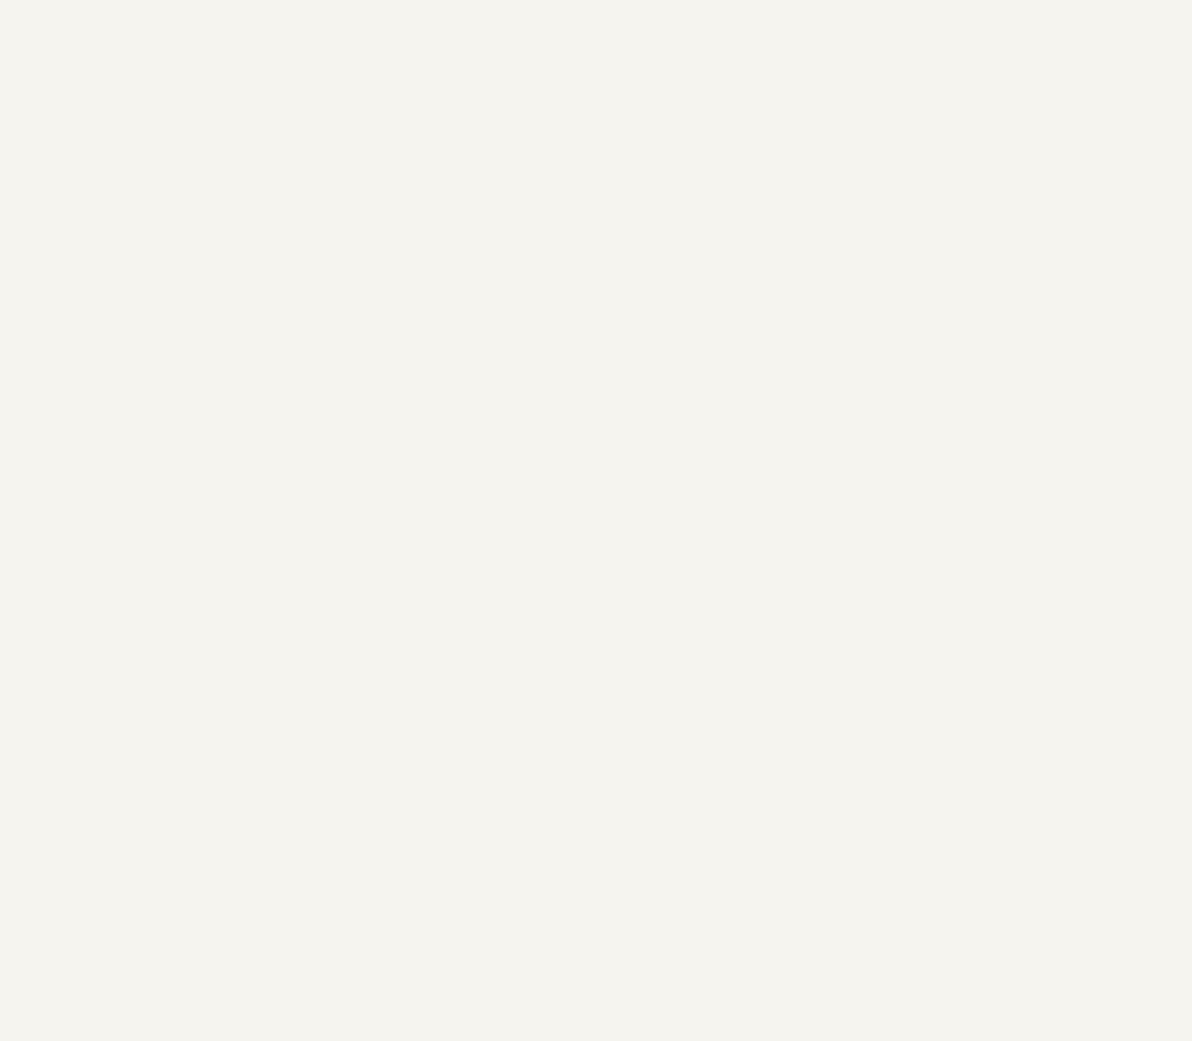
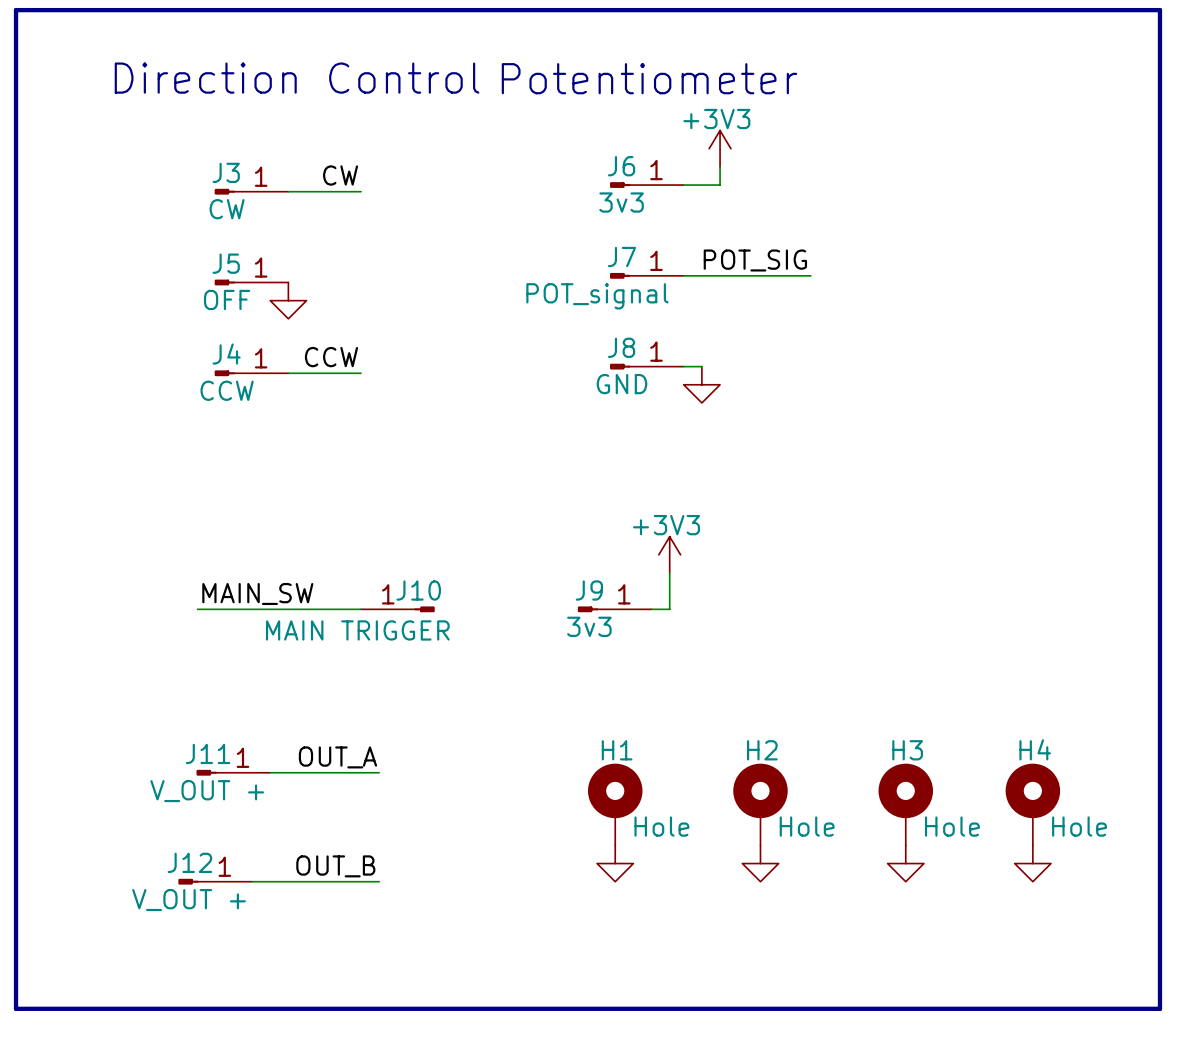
line: none -> (16, 10) (1159, 10) (1159, 1008) (16, 1008) (16, 10)
text: none -> Direction Control (297, 78)
text: none -> Potentiometer (649, 78)
power symbol: none -> +3V3 (720, 148)
wire: none -> (720, 166) (720, 185) (683, 185)
label: none -> CW (340, 175)
J6: none -> 3v3 (646, 185)
J3: none -> CW (251, 191)
wire: none -> (288, 191) (361, 191)
label: none -> POT_SIG (755, 260)
J7: none -> POT_signal (646, 275)
wire: none -> (683, 275) (810, 275)
J5: none -> OFF (251, 282)
power symbol: none -> (288, 300)
label: none -> CCW (331, 357)
J8: none -> GND (646, 366)
wire: none -> (683, 366) (701, 366)
J4: none -> CCW (251, 373)
wire: none -> (288, 373) (361, 373)
power symbol: none -> (701, 384)
power symbol: none -> +3V3 (669, 554)
wire: none -> (669, 573) (669, 609) (651, 609)
label: none -> MAIN_SW (257, 594)
wire: none -> (197, 609) (361, 609)
J10: none -> MAIN TRIGGER (397, 609)
J9: none -> 3v3 (614, 609)
label: none -> OUT_A (337, 757)
J11: none -> V_OUT + (233, 772)
wire: none -> (270, 772) (379, 772)
H1: none -> Hole (615, 804)
H2: none -> Hole (760, 804)
H3: none -> Hole (905, 804)
H4: none -> Hole (1032, 804)
power symbol: none -> (615, 863)
power symbol: none -> (760, 863)
power symbol: none -> (905, 863)
power symbol: none -> (1032, 863)
label: none -> OUT_B (335, 866)
J12: none -> V_OUT + (215, 881)
wire: none -> (252, 881) (379, 881)

